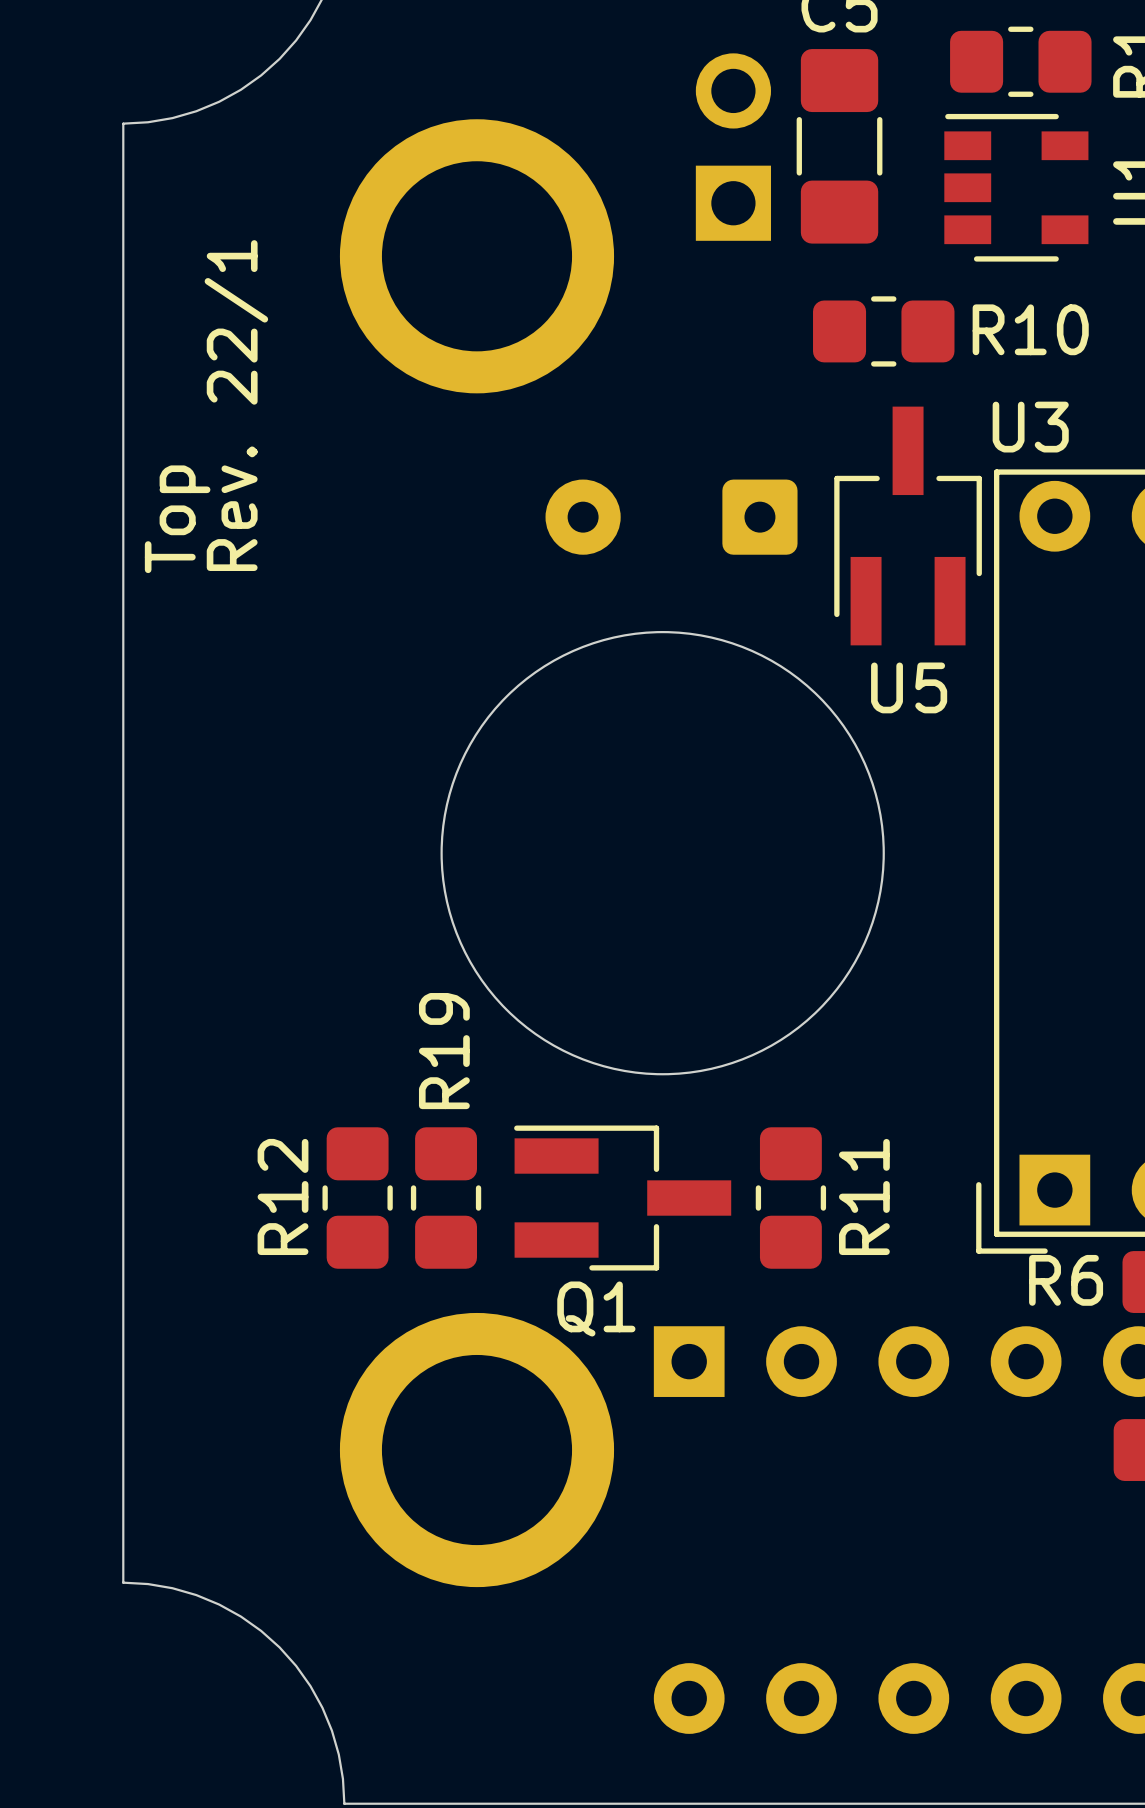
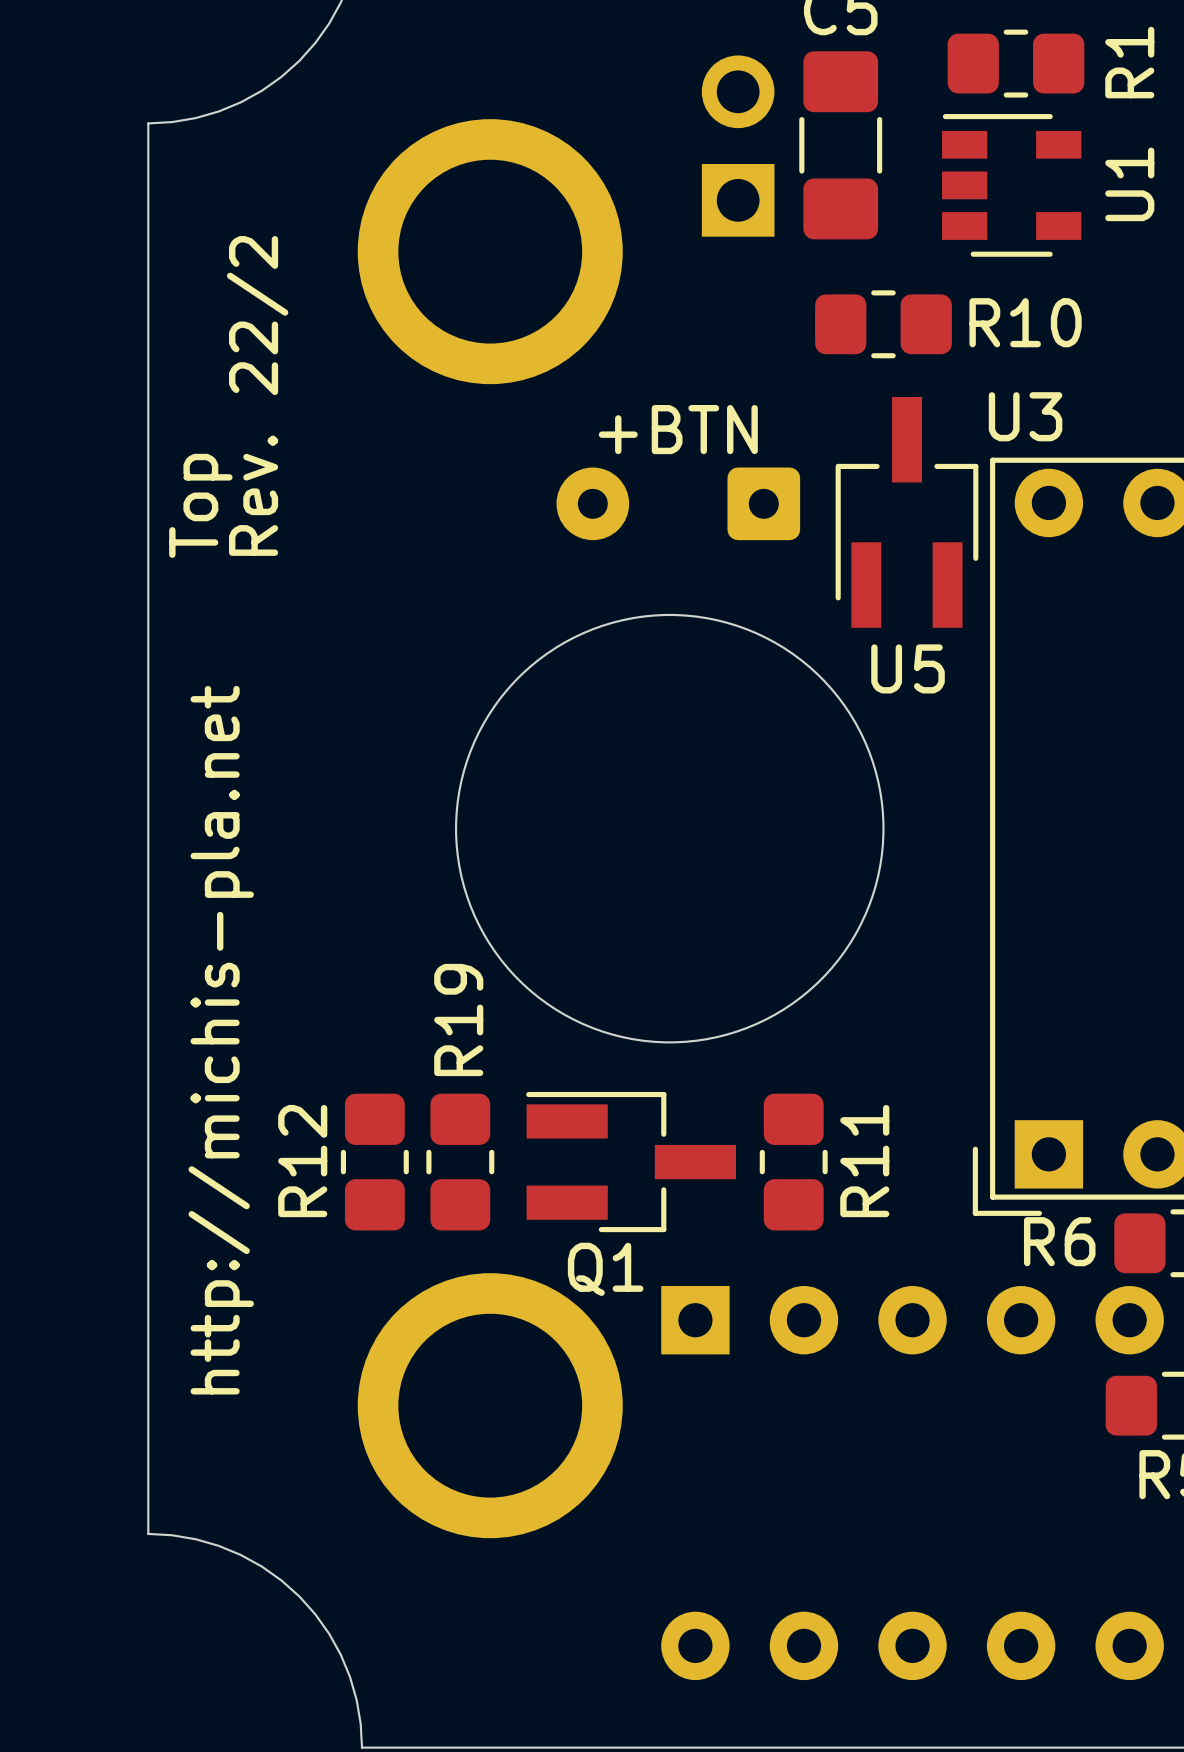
text: Rev. 22/1 (236, 405) -> Rev. 22/2 (257, 395)
text: none -> +BTN (678, 429)
text: none -> http://michis-pla.net (221, 1040)

